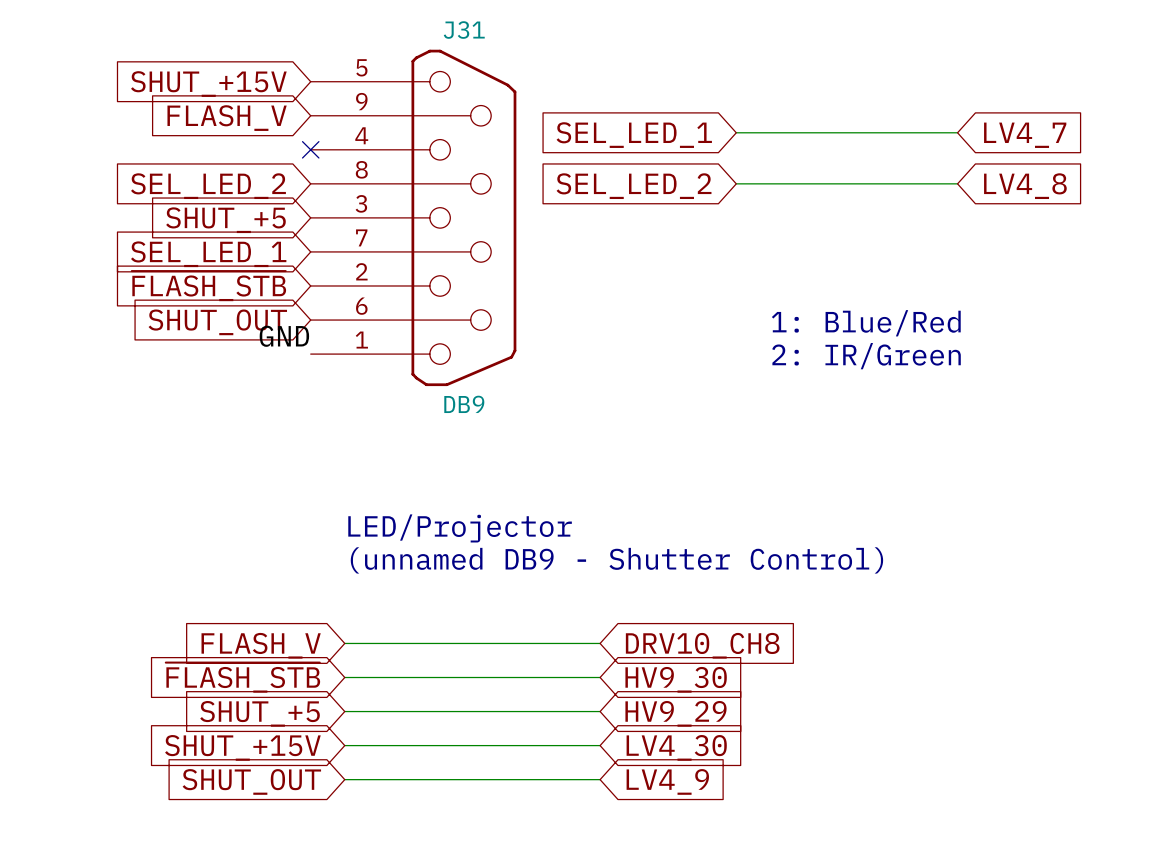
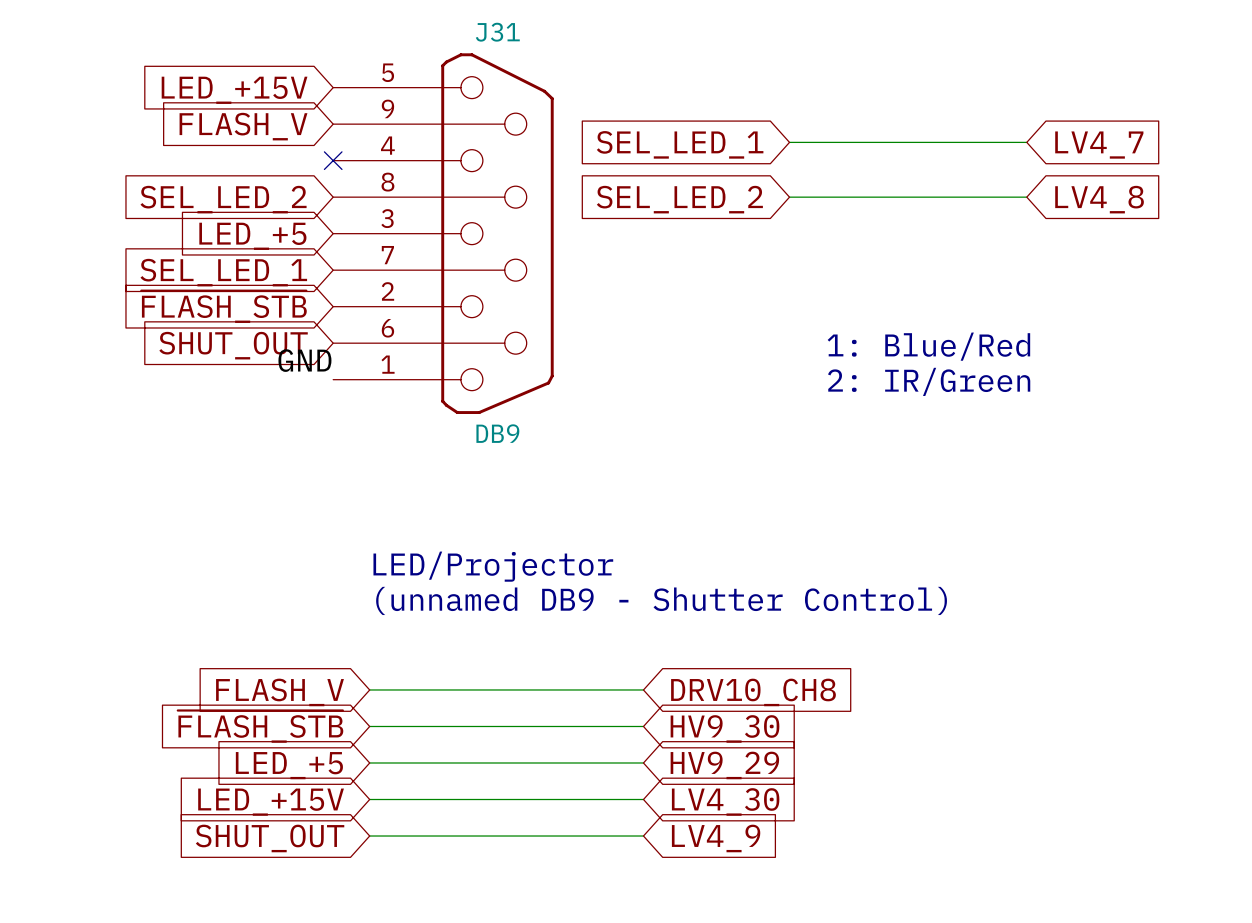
global label: SHUT_+15V (208, 84) -> LED_+15V (234, 90)
global label: SHUT_+5 (225, 220) -> LED_+5 (252, 236)
global label: SHUT_+5 (260, 713) -> LED_+5 (289, 765)
global label: SHUT_+15V (242, 747) -> LED_+15V (271, 802)

